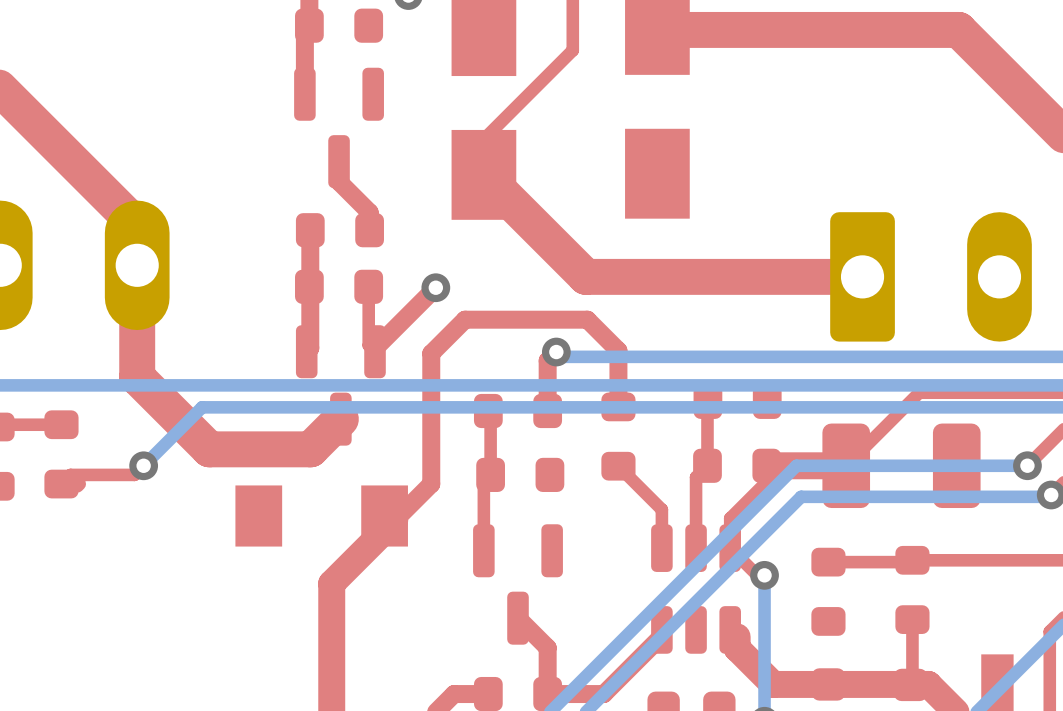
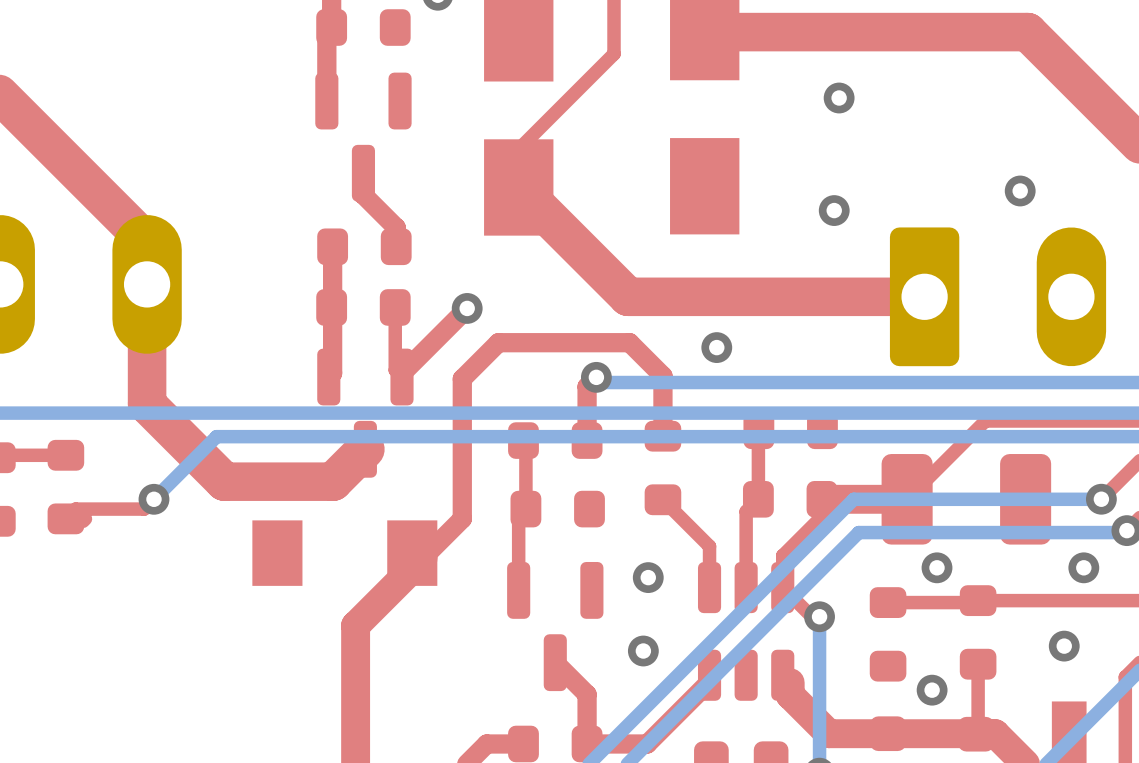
via: none -> (839, 98)
via: none -> (1020, 190)
via: none -> (834, 210)
via: none -> (716, 347)
via: none -> (937, 567)
via: none -> (1083, 567)
via: none -> (648, 577)
via: none -> (1064, 646)
via: none -> (643, 651)
via: none -> (932, 690)

